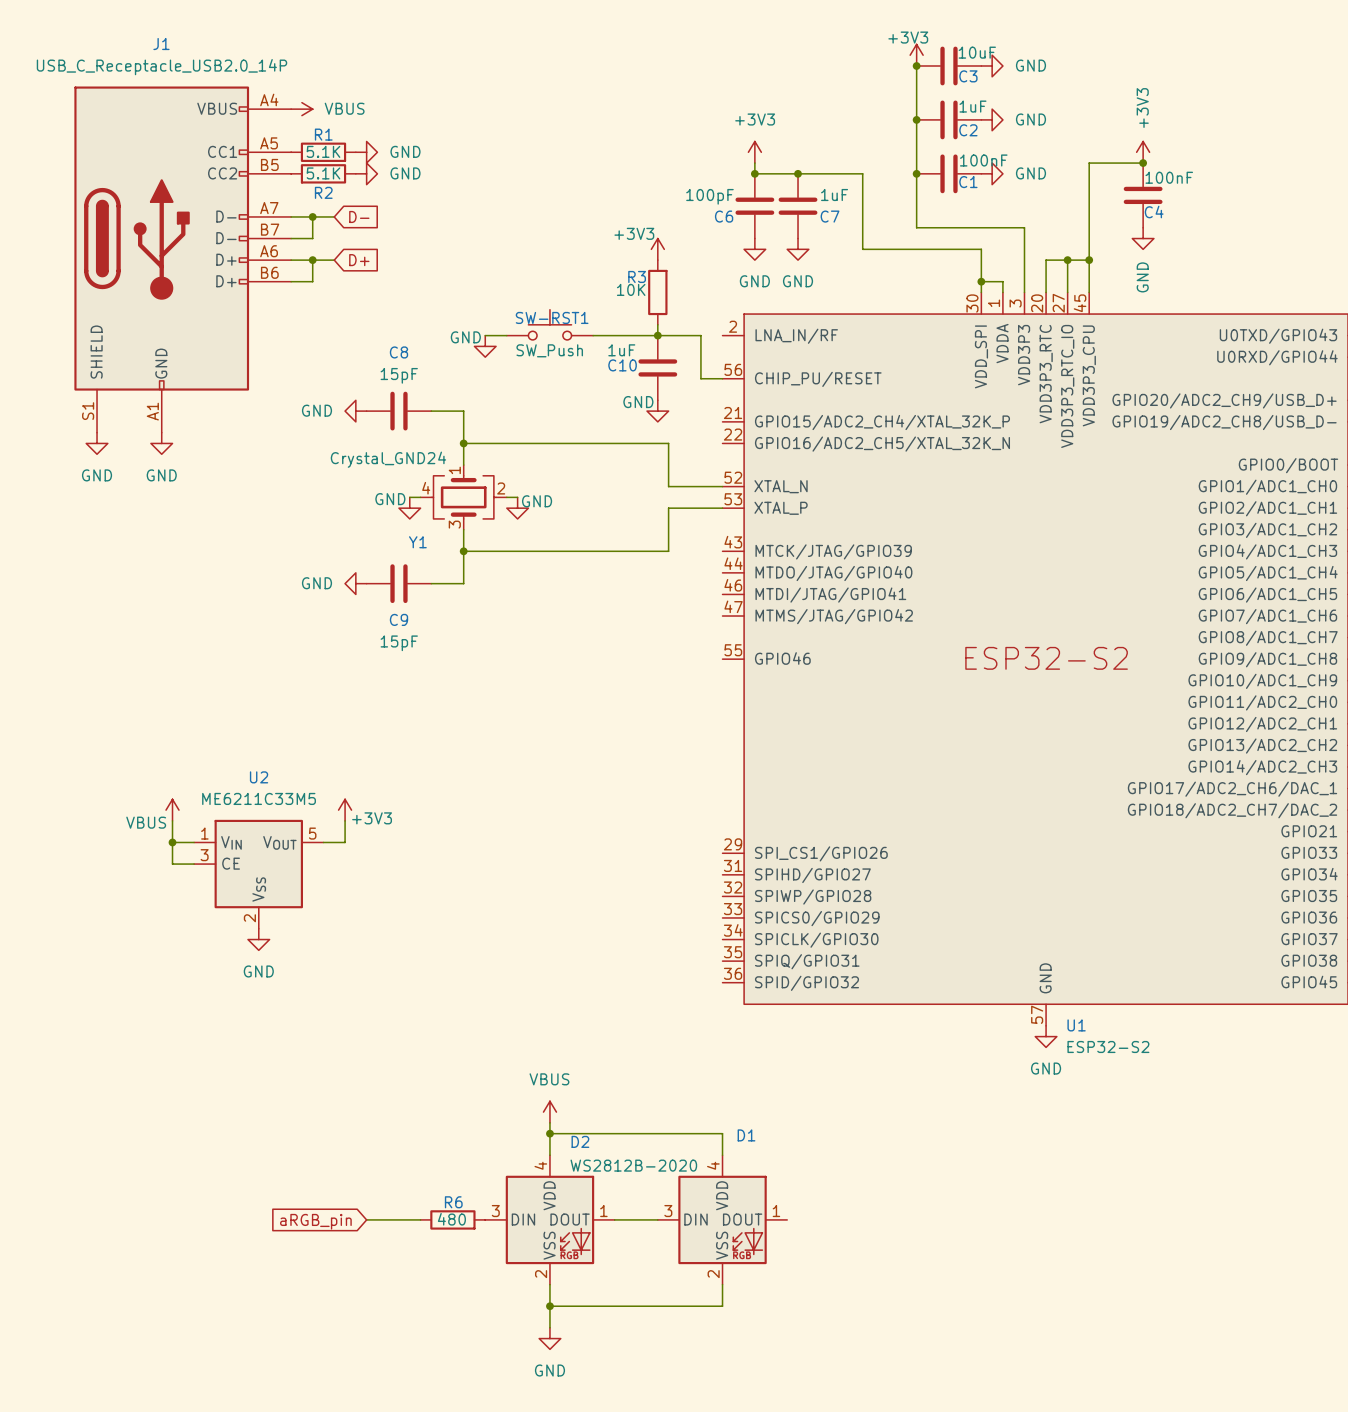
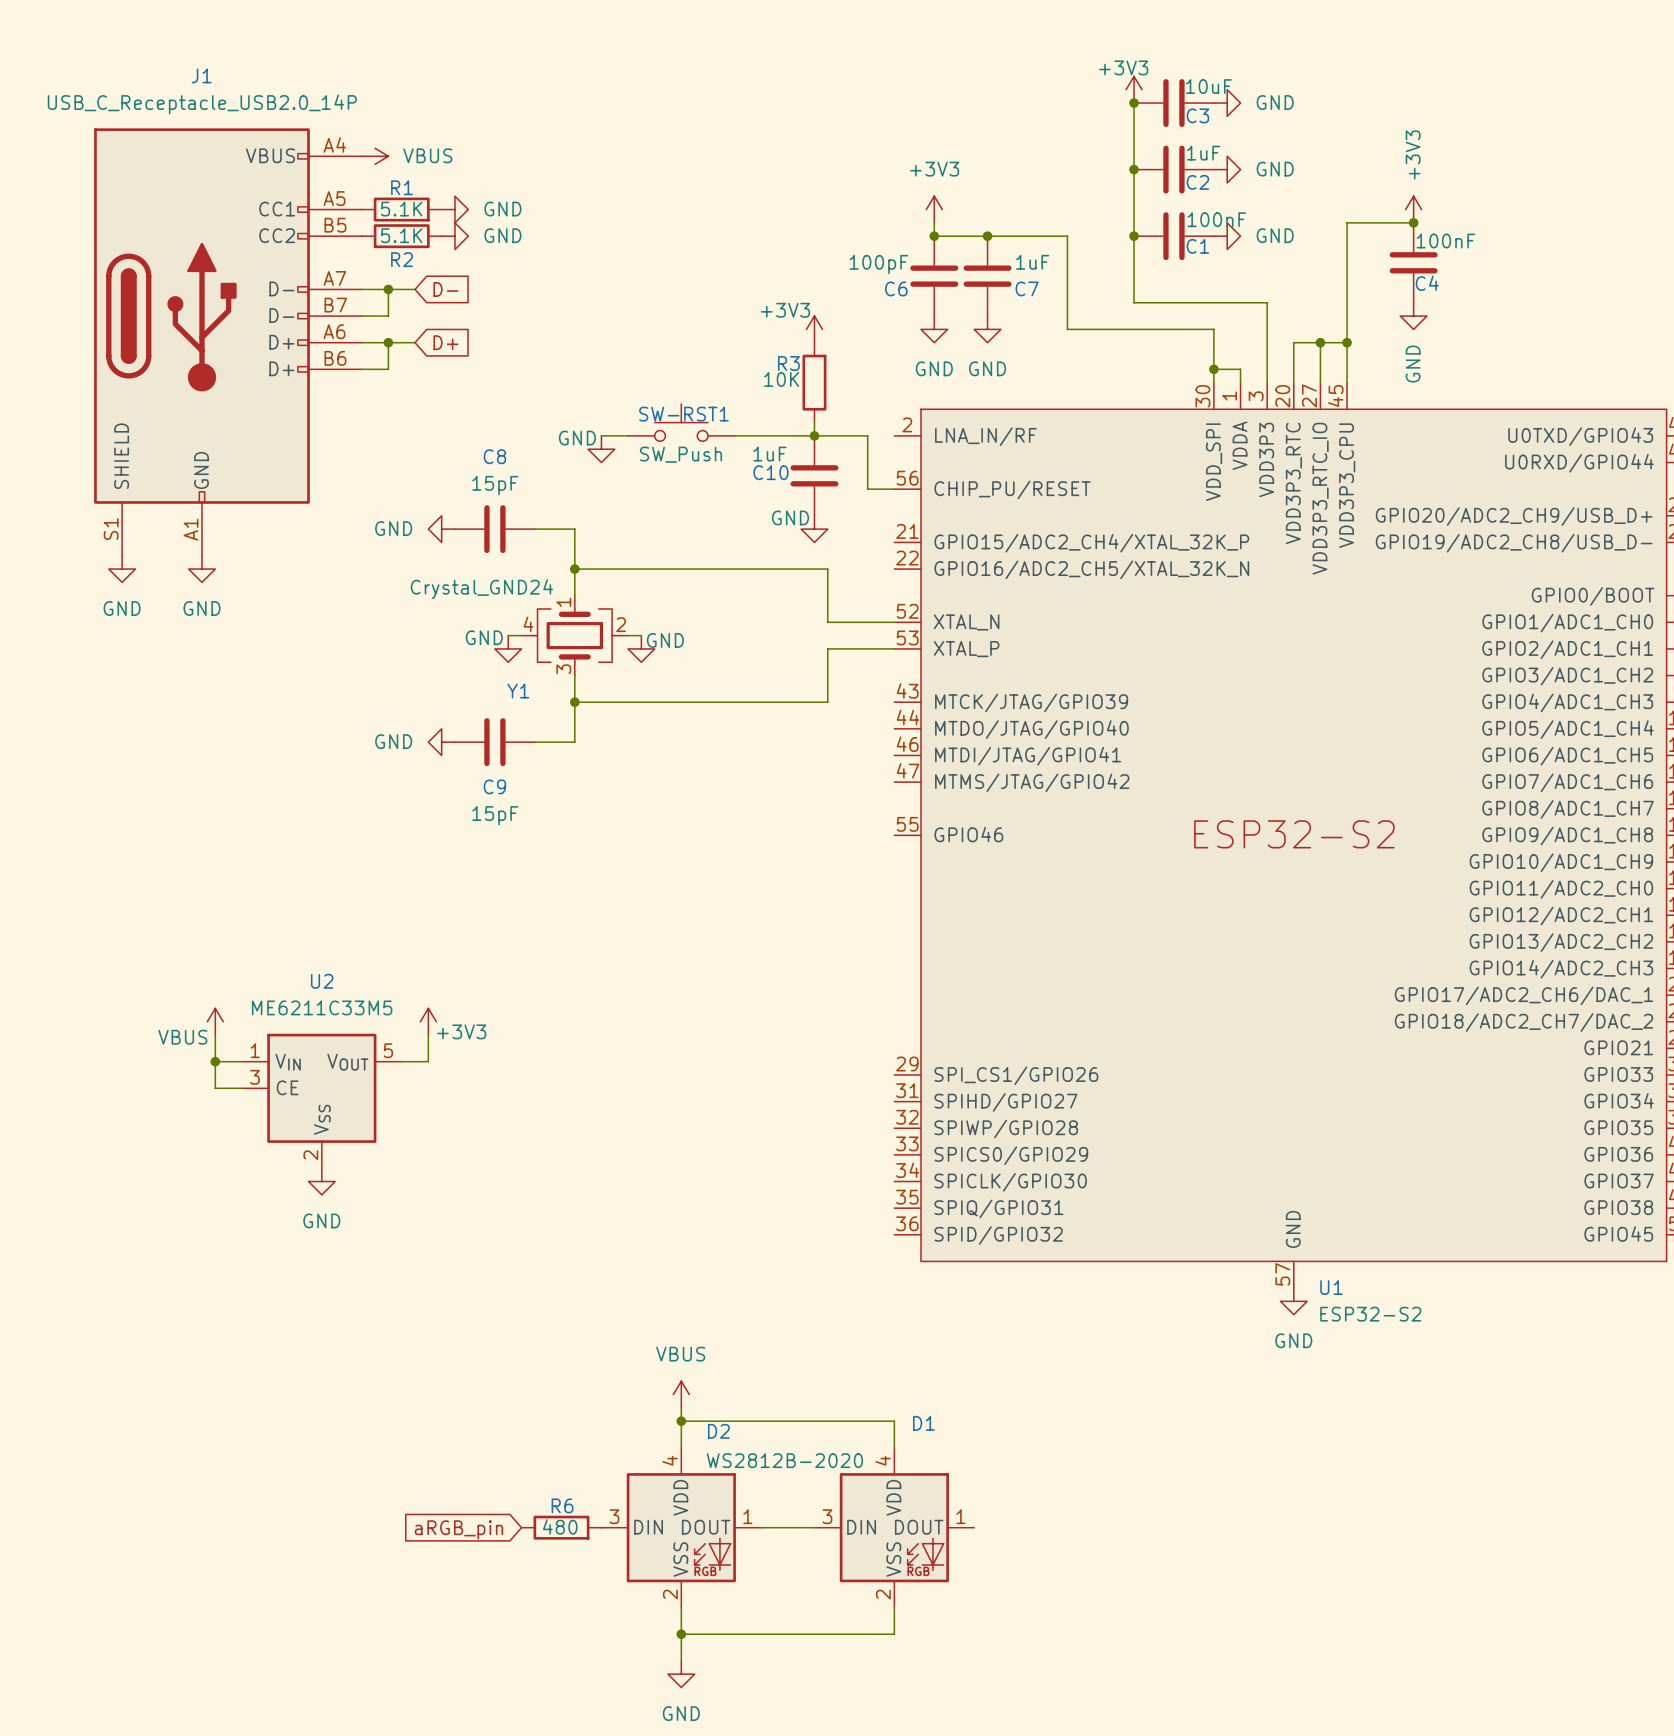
wire: (366, 1219) (420, 1219) -> none
global label position: aRGB_pin (315, 1221) -> aRGB_pin (458, 1529)

